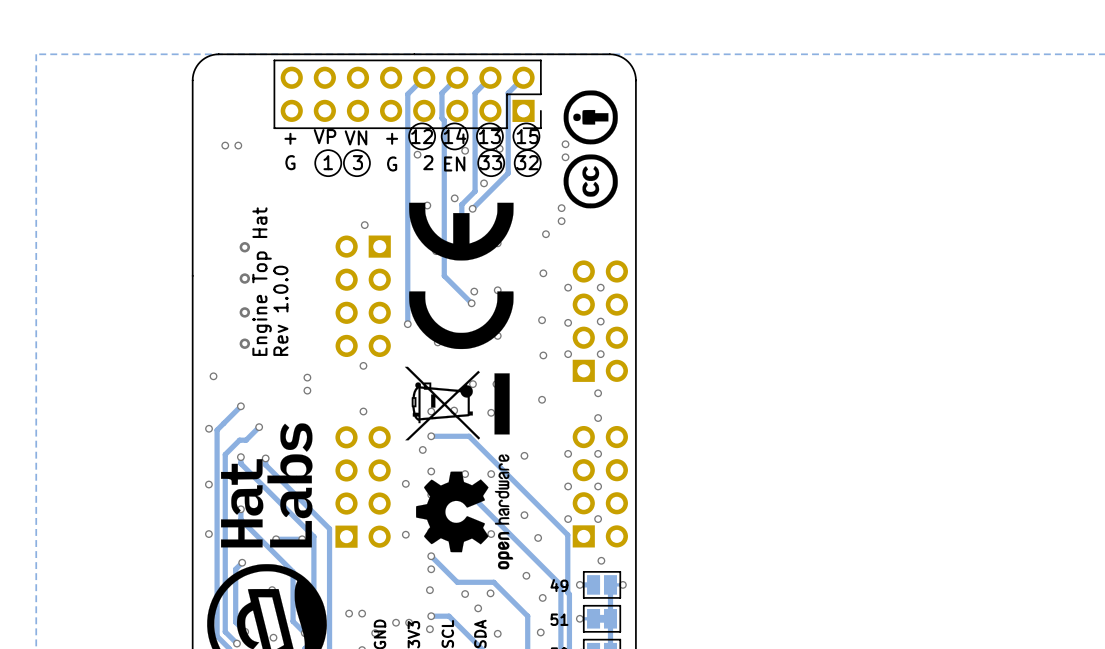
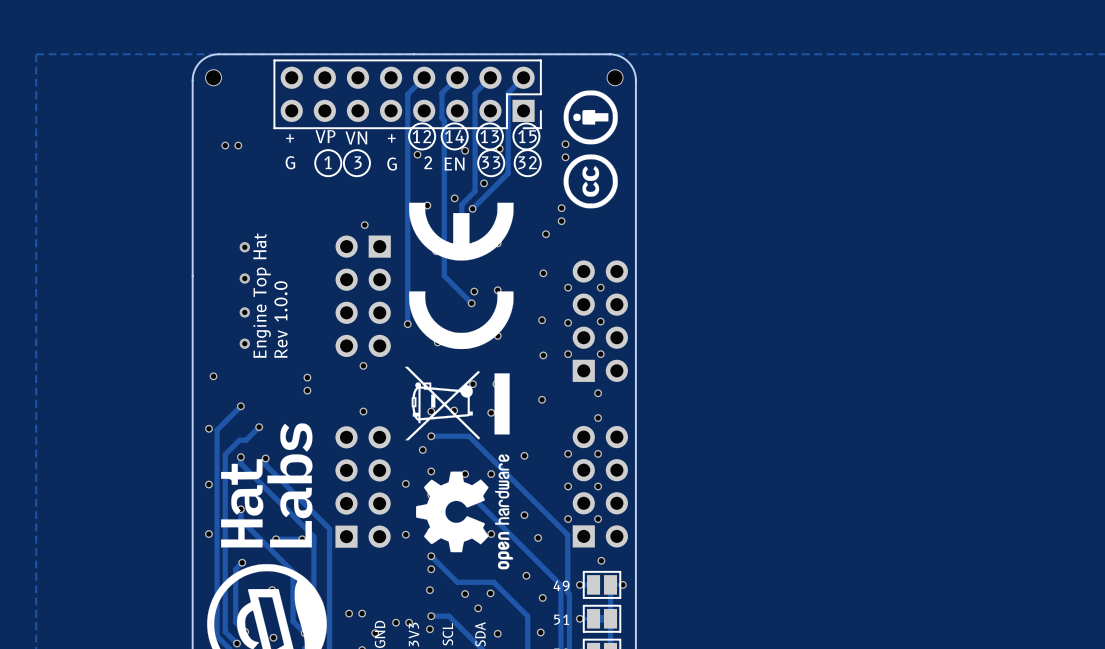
part: none -> (213, 77)
part: none -> (615, 77)

